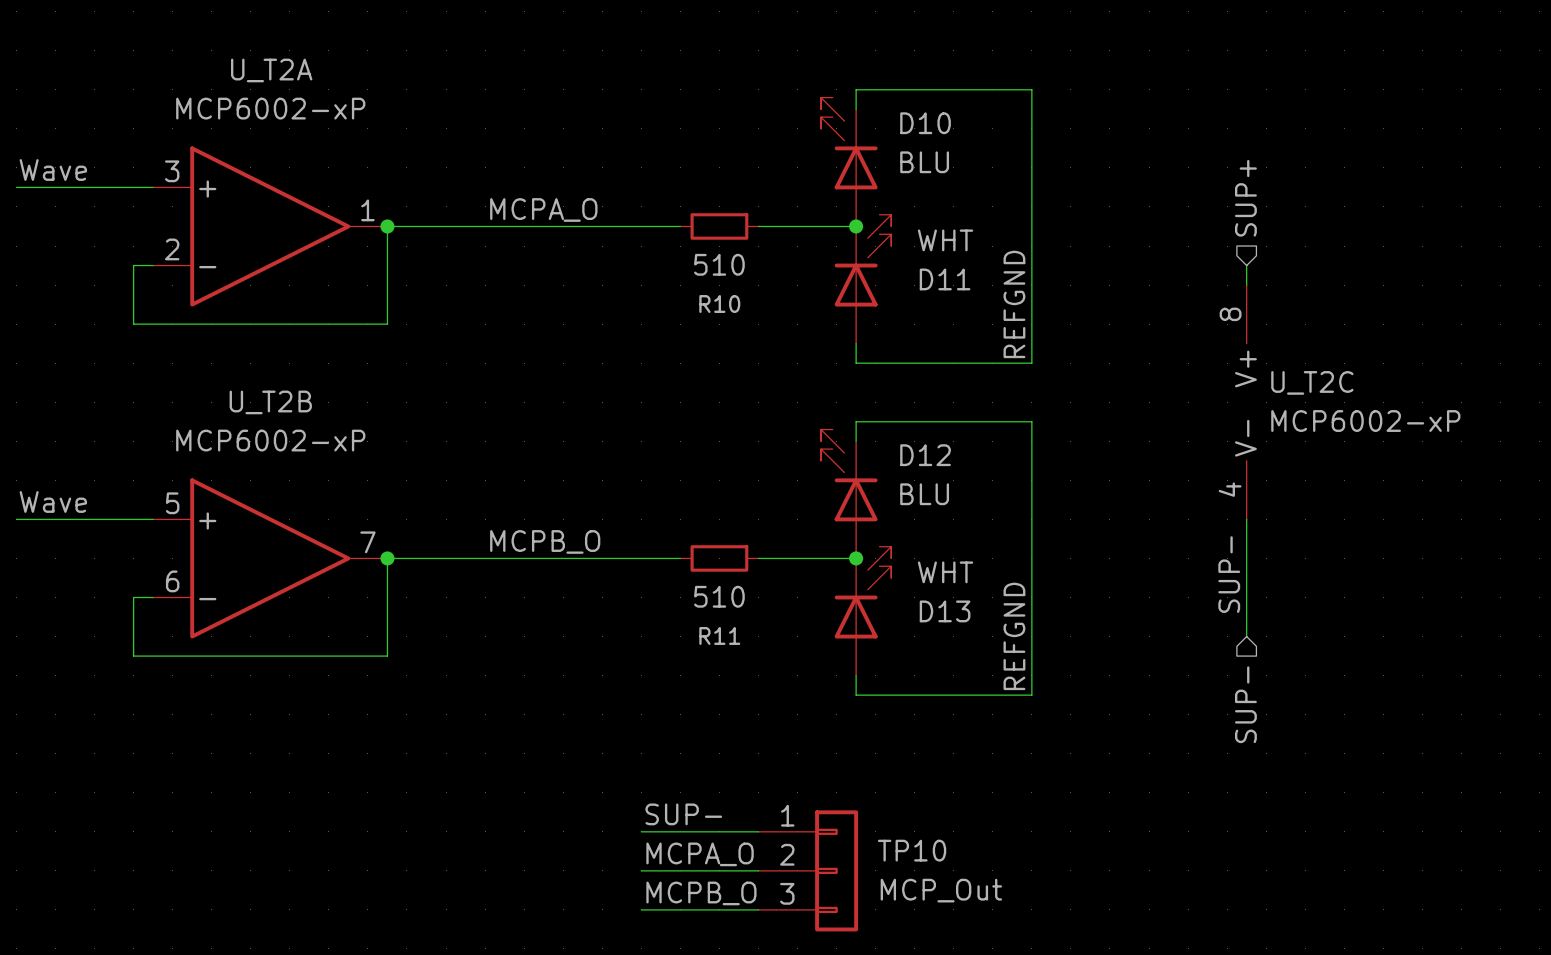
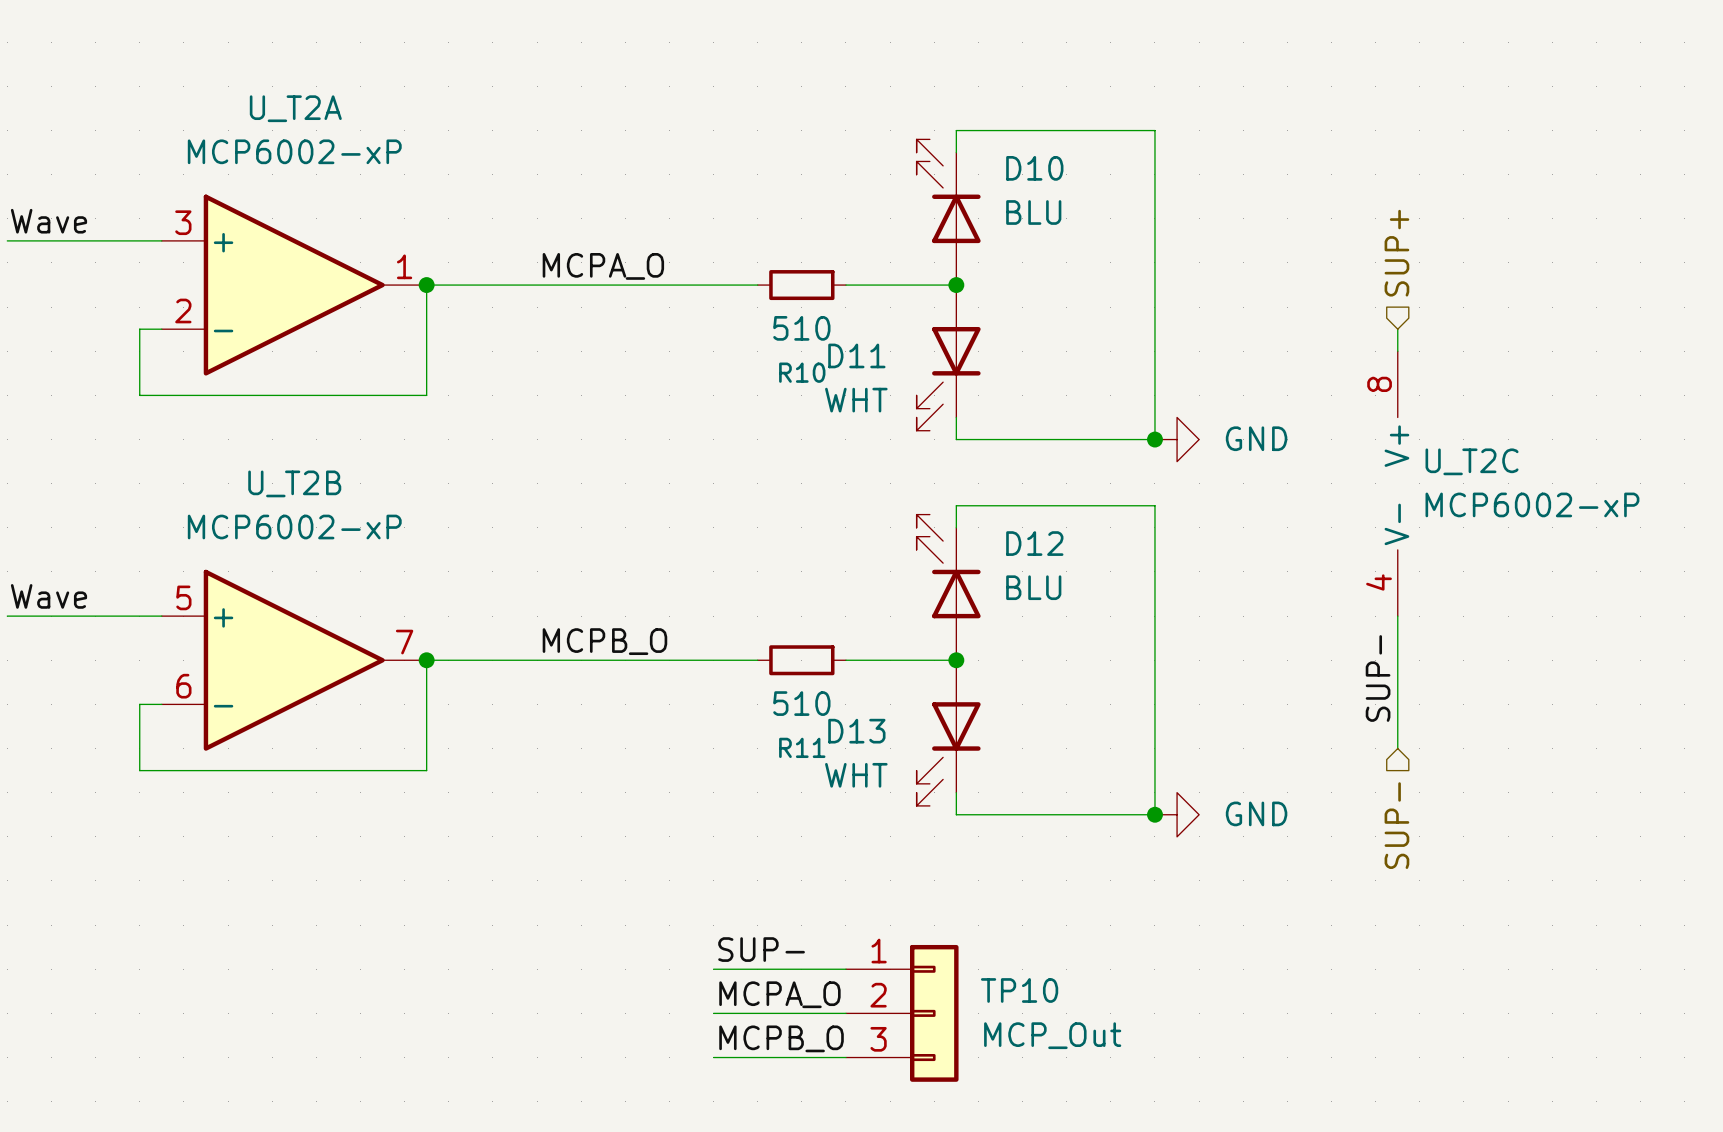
D11 rotation: 0° (862, 260) -> 180° (948, 378)
label: REFGND (1014, 304) -> none
junction: none -> (1154, 439)
power symbol: none -> GND (1177, 439)
D13 rotation: 0° (862, 592) -> 180° (948, 754)
label: REFGND (1014, 636) -> none
junction: none -> (1154, 814)
power symbol: none -> GND (1177, 814)

